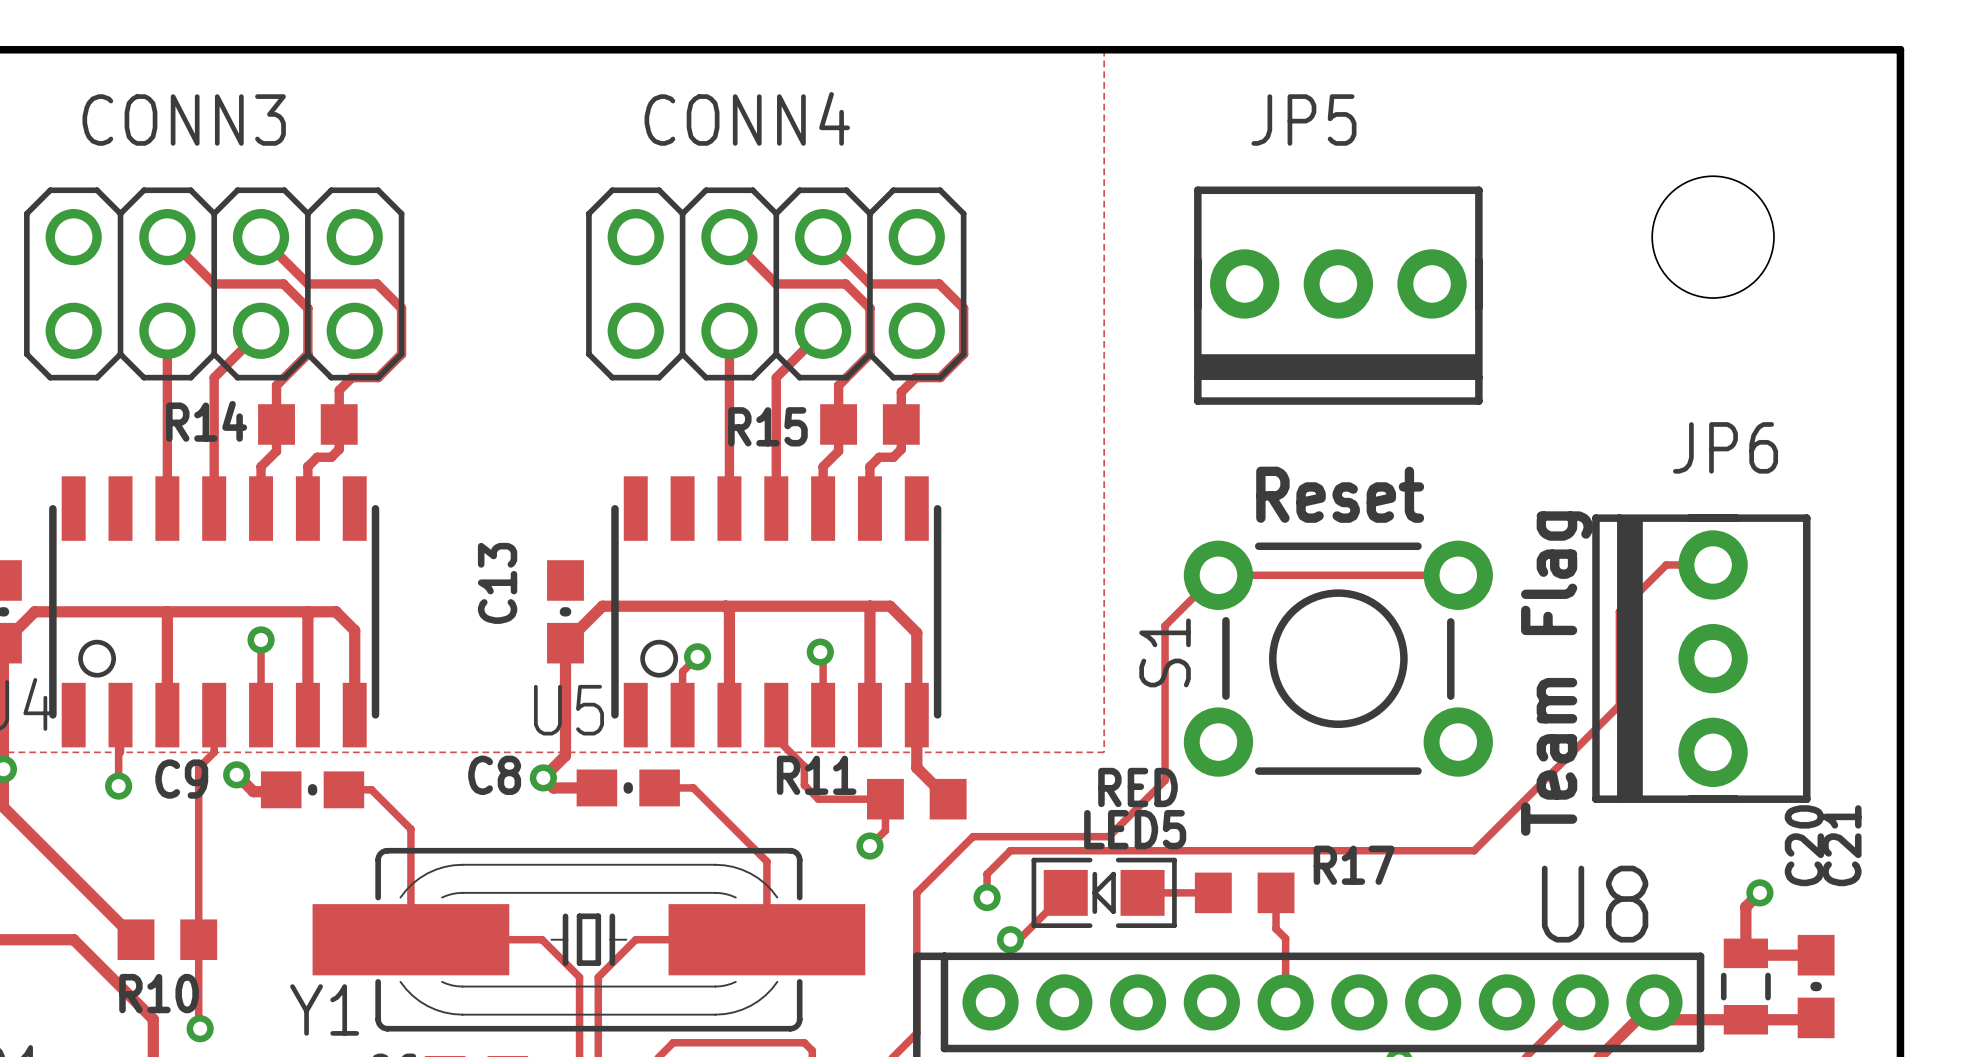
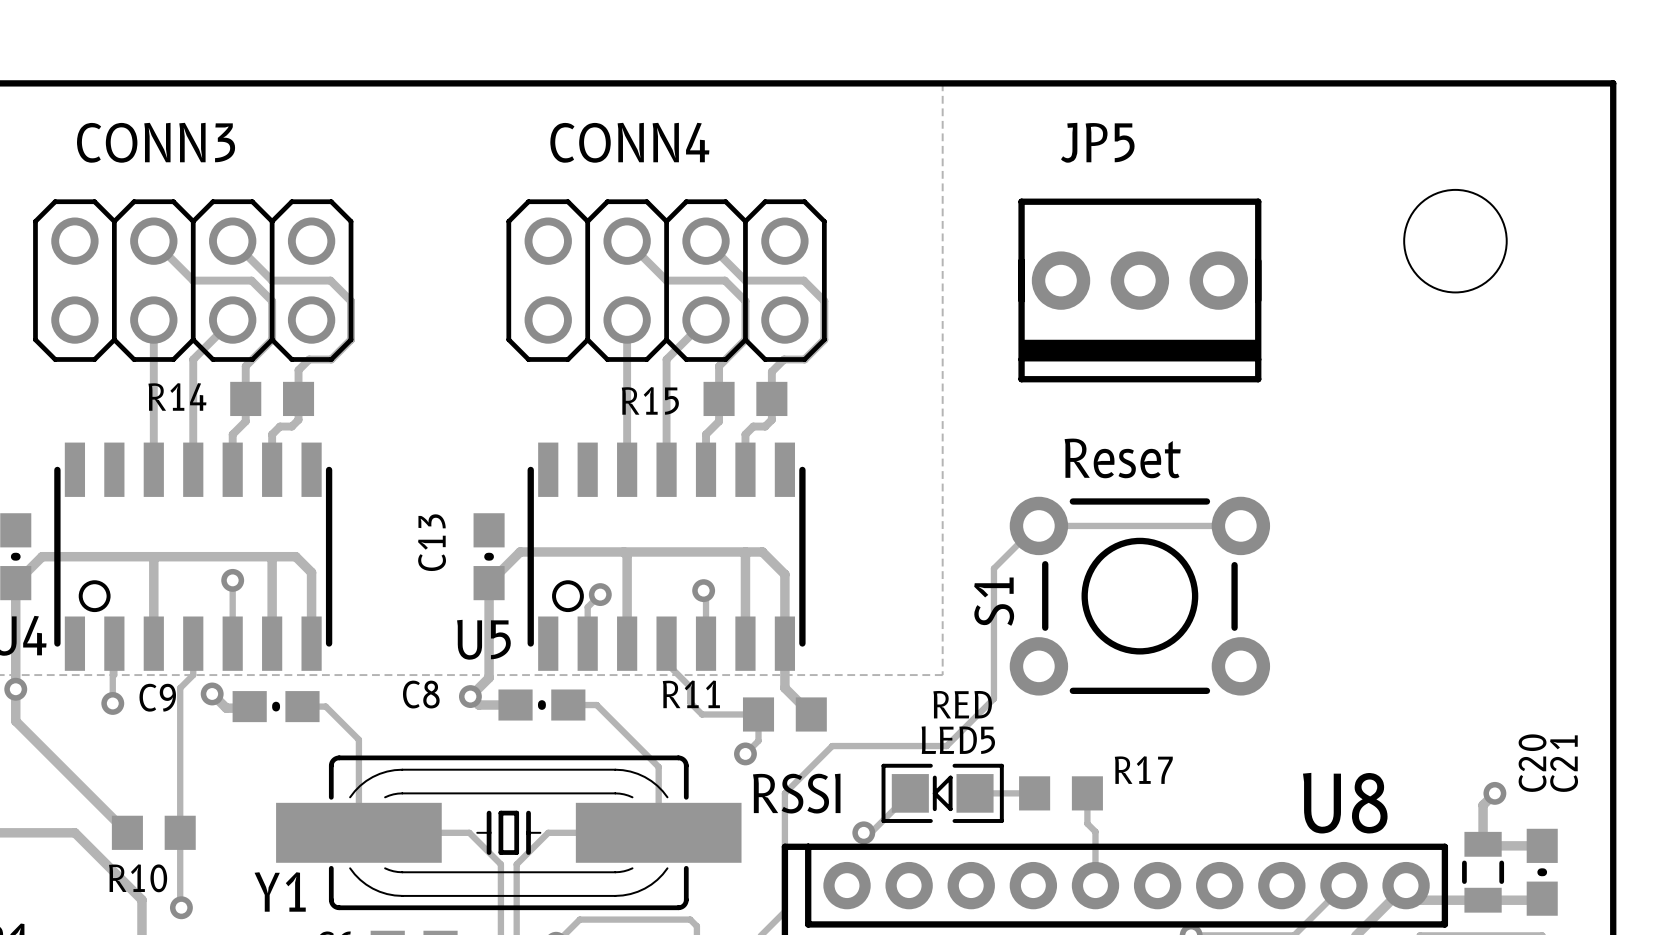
track: (1713, 564) (1666, 564) (1619, 611) (1619, 705) (1474, 850) (1010, 850) (987, 874) (987, 897) -> none
JP6: (1701, 658) -> none
text: Team Flag (1556, 673) -> none
text: none -> RSSI (796, 793)
via: (987, 897) -> none

